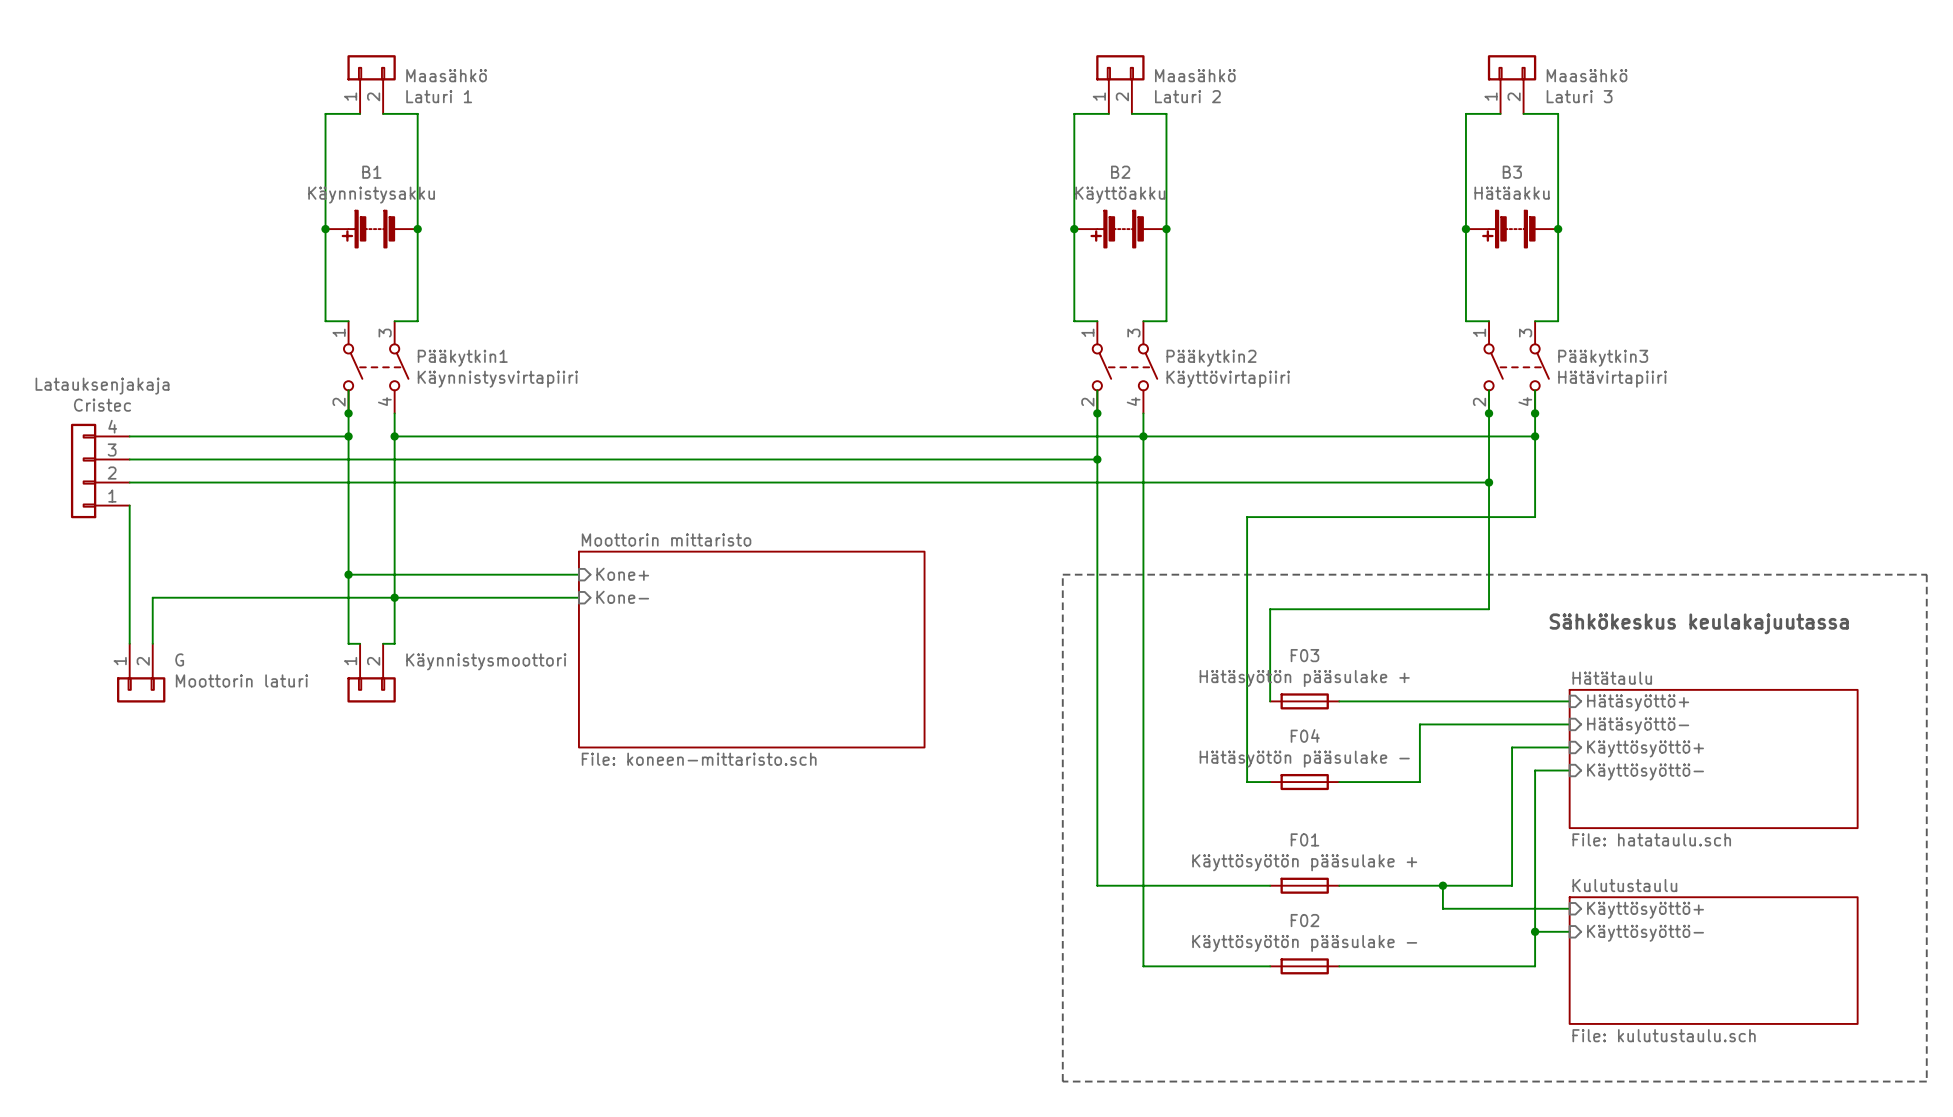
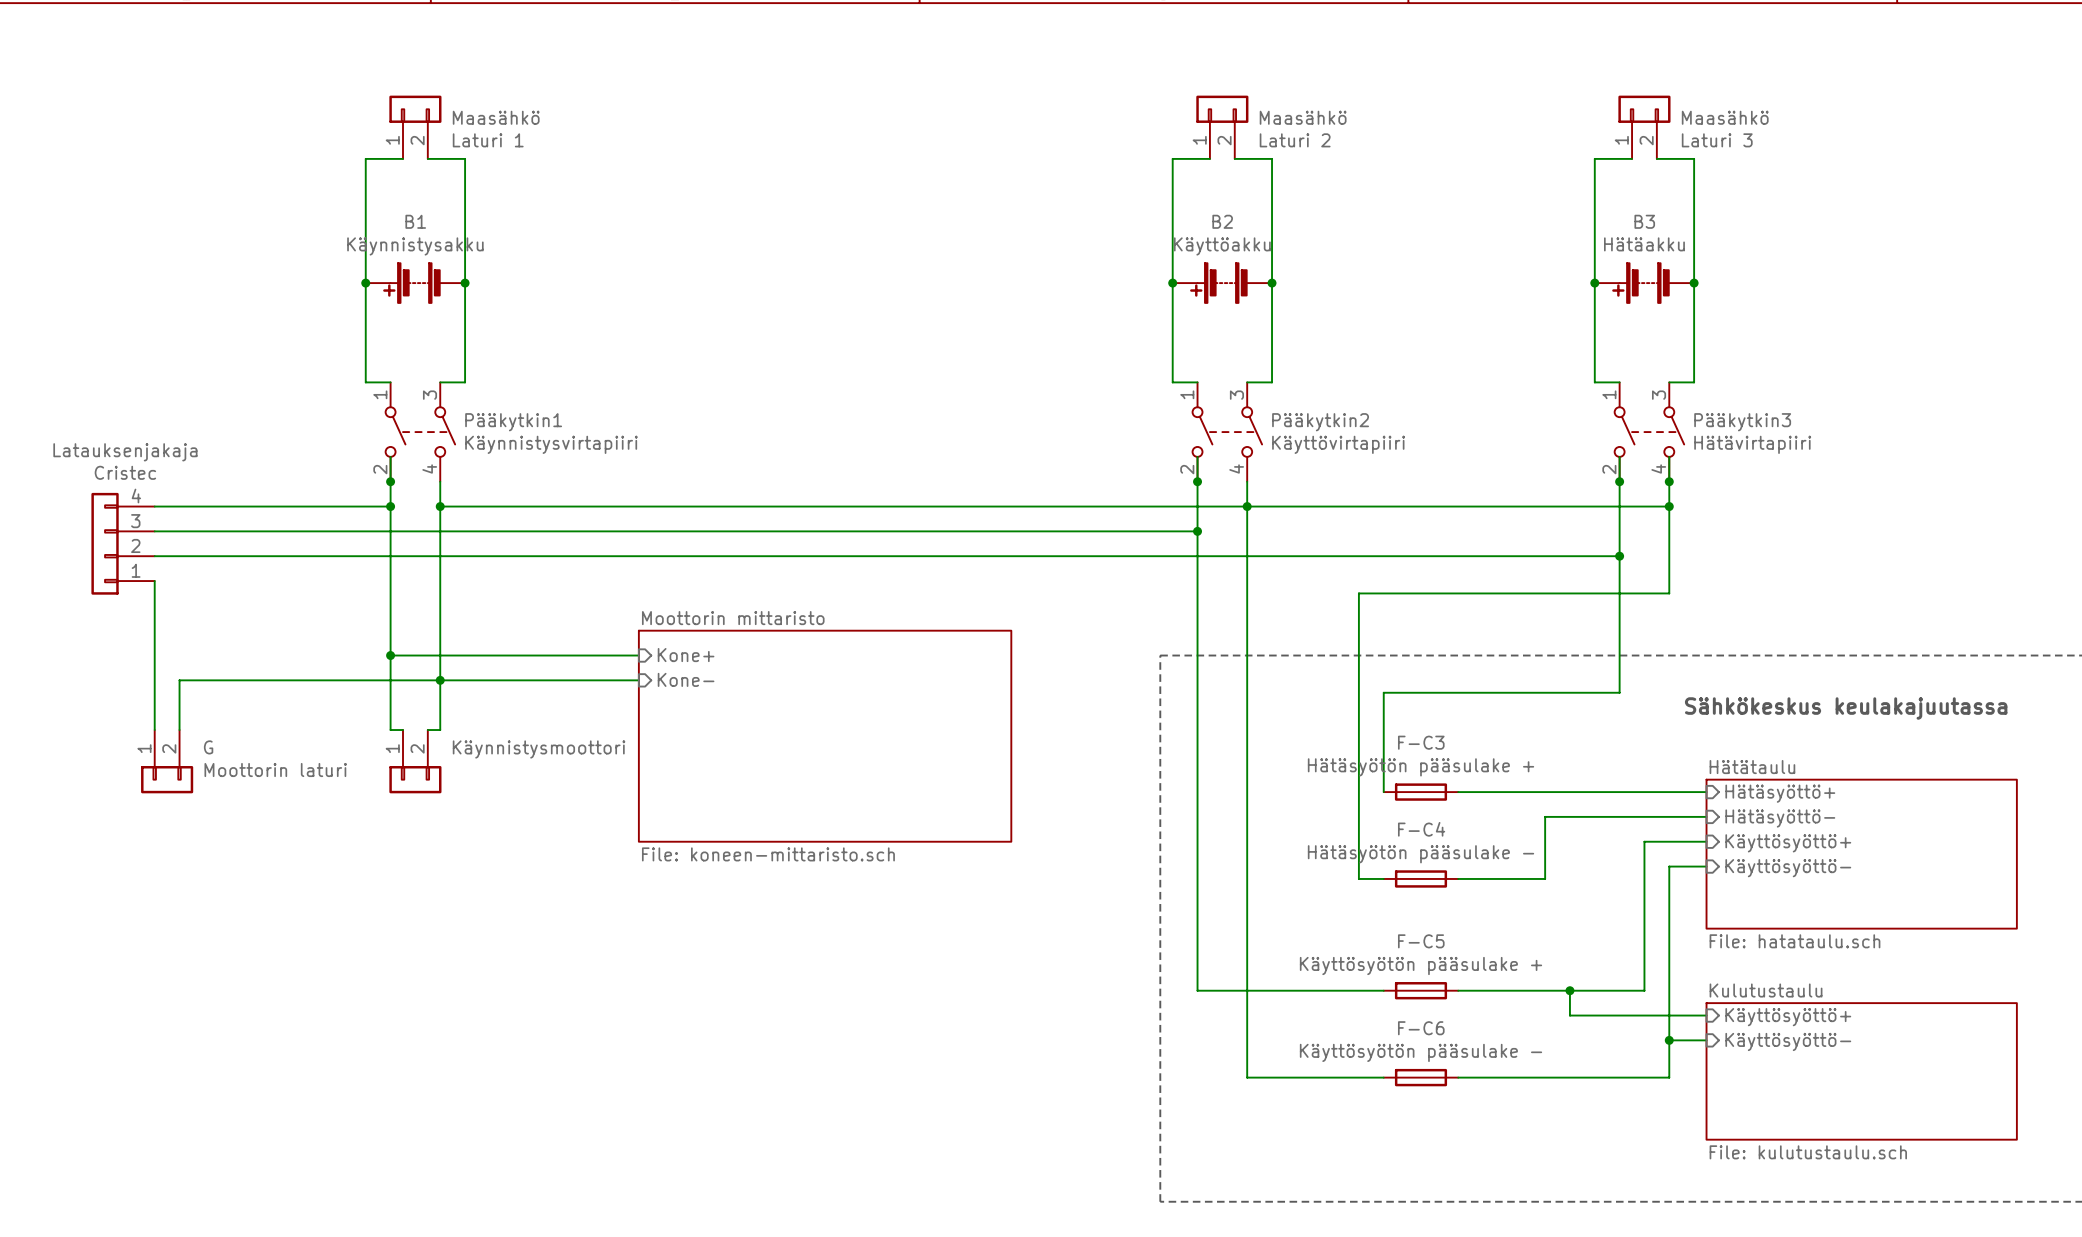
F03 name: F03 (1304, 655) -> F-C3 (1421, 742)
F04 name: F04 (1305, 735) -> F-C4 (1421, 829)
F01 name: F01 (1304, 839) -> F-C5 (1421, 941)
F02 name: F02 (1304, 920) -> F-C6 (1421, 1028)

